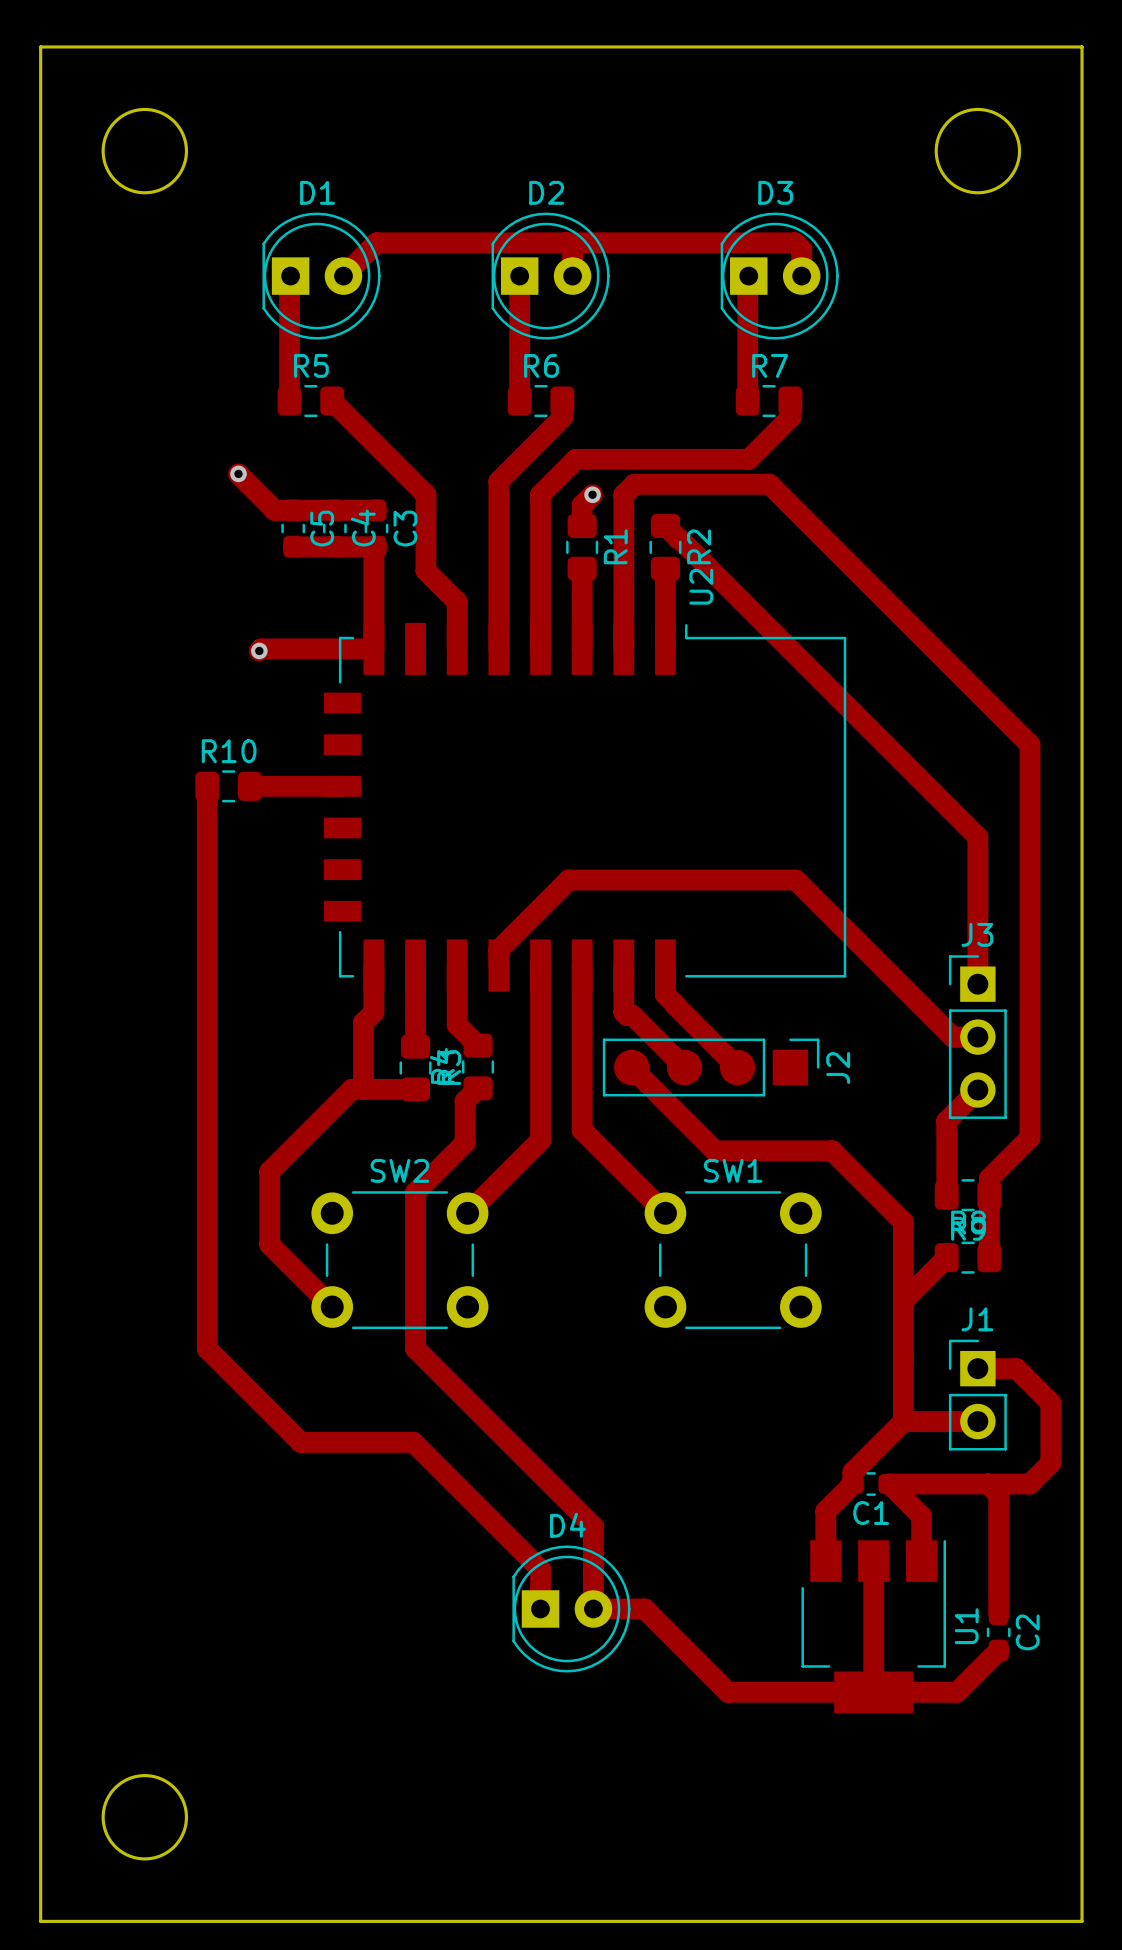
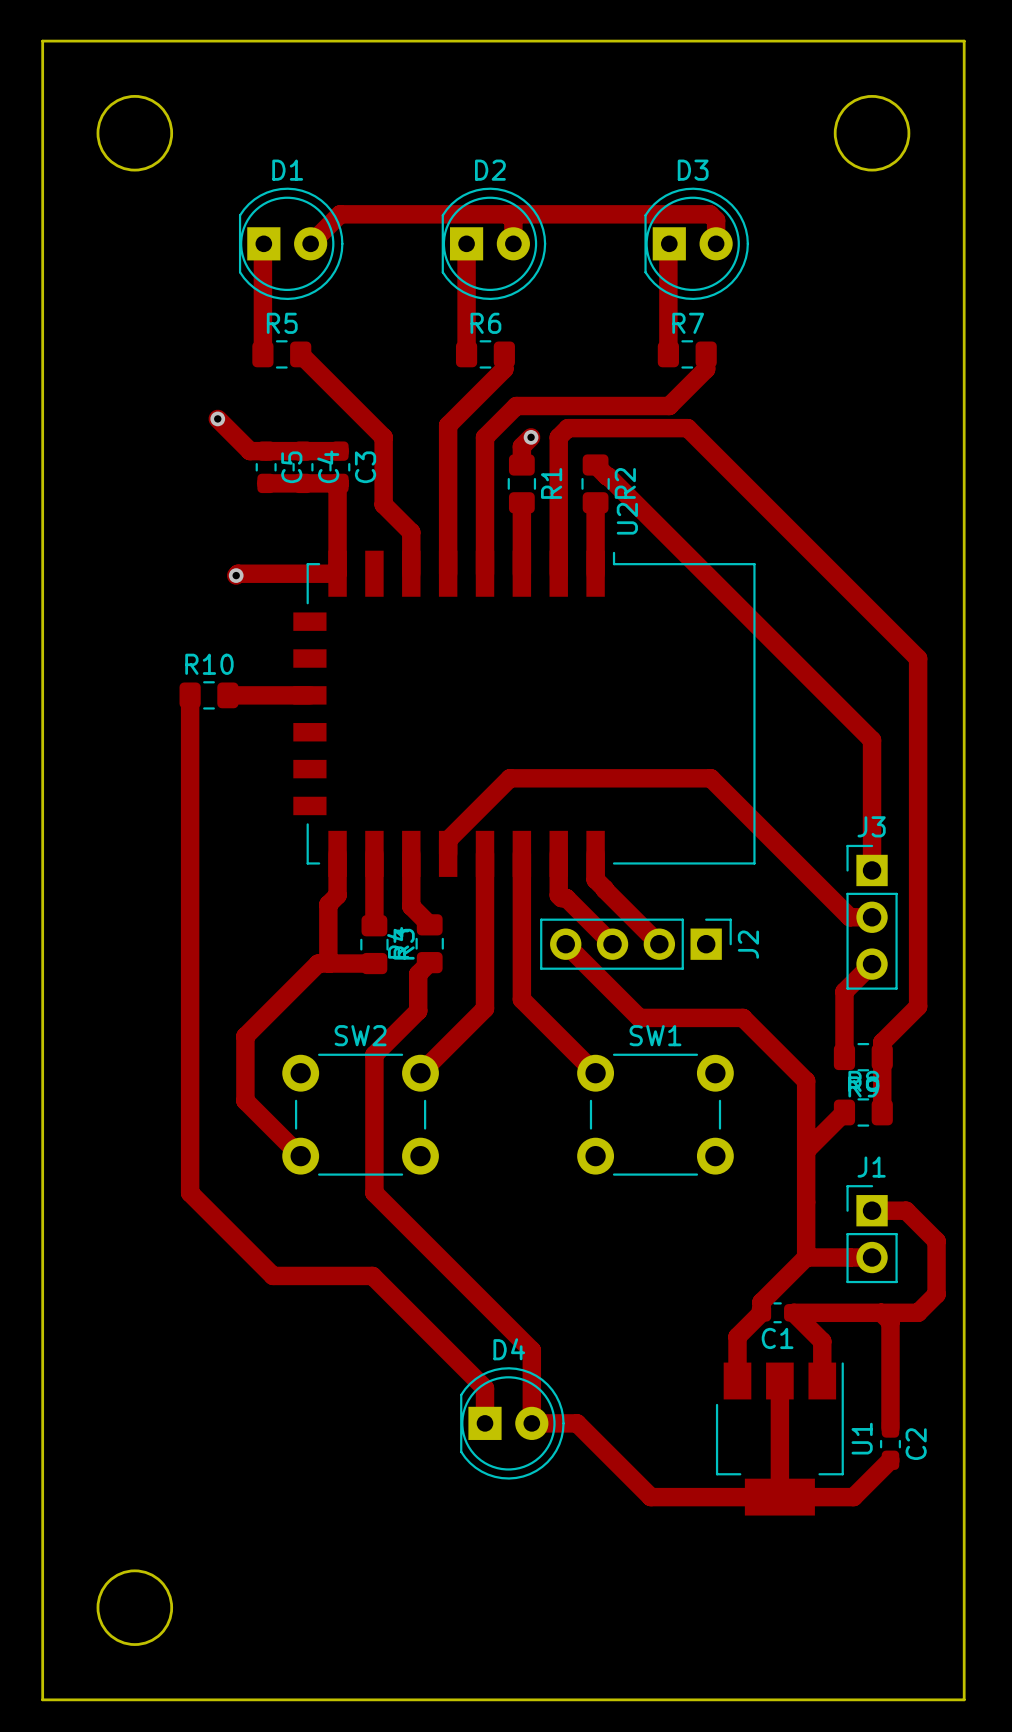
J2 footprint: [602, 1038, 820, 1097] -> [540, 918, 732, 970]

